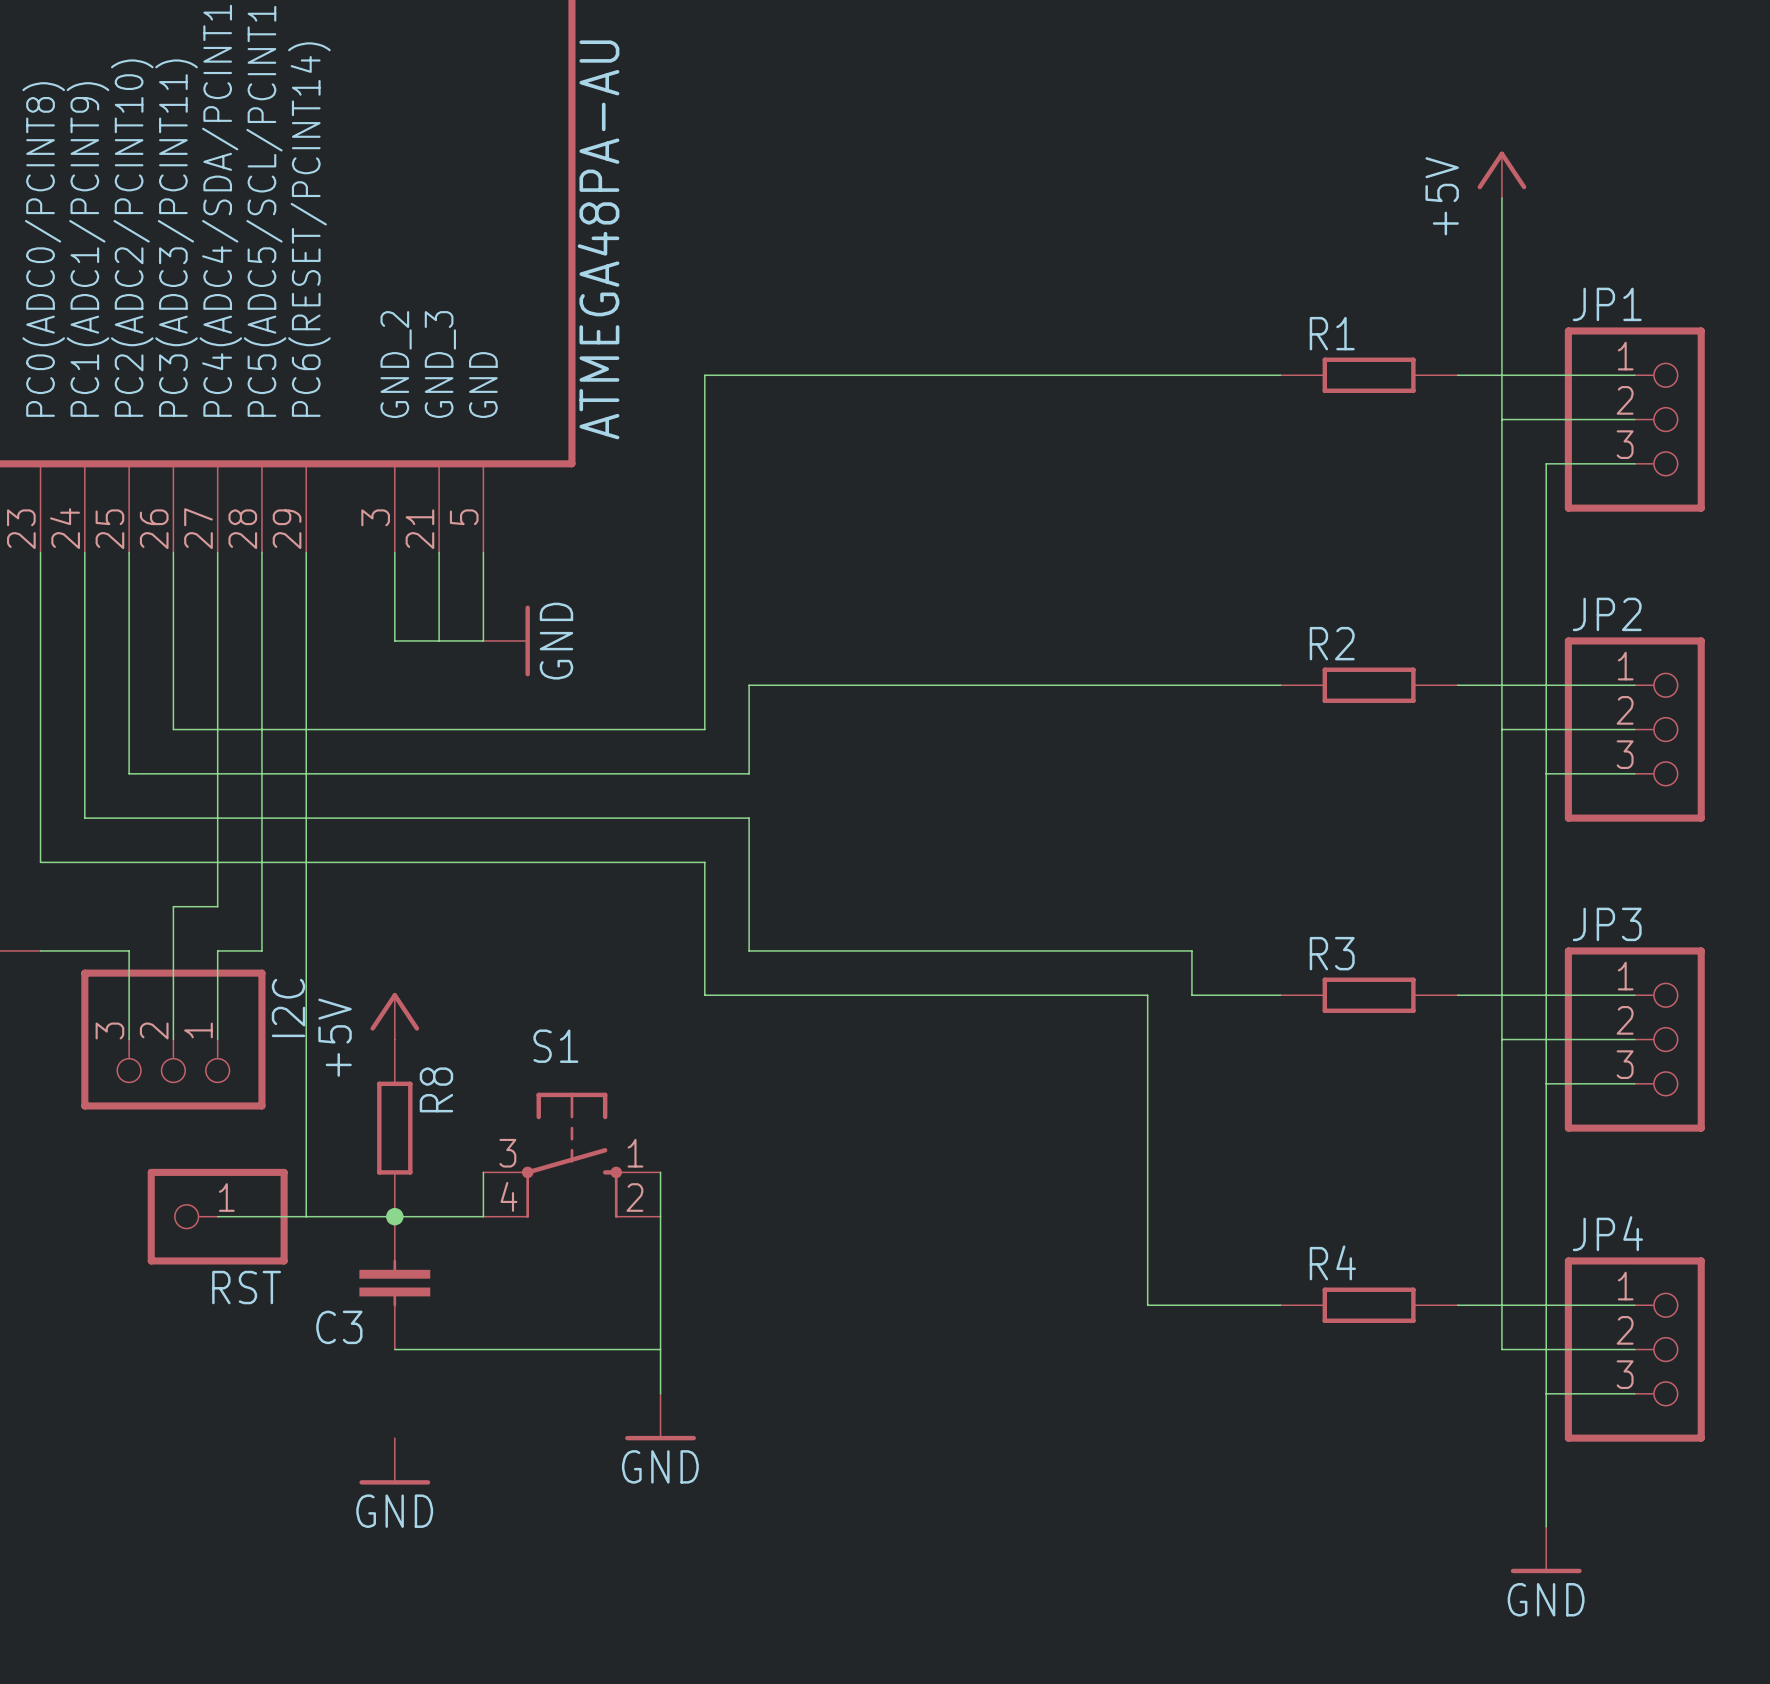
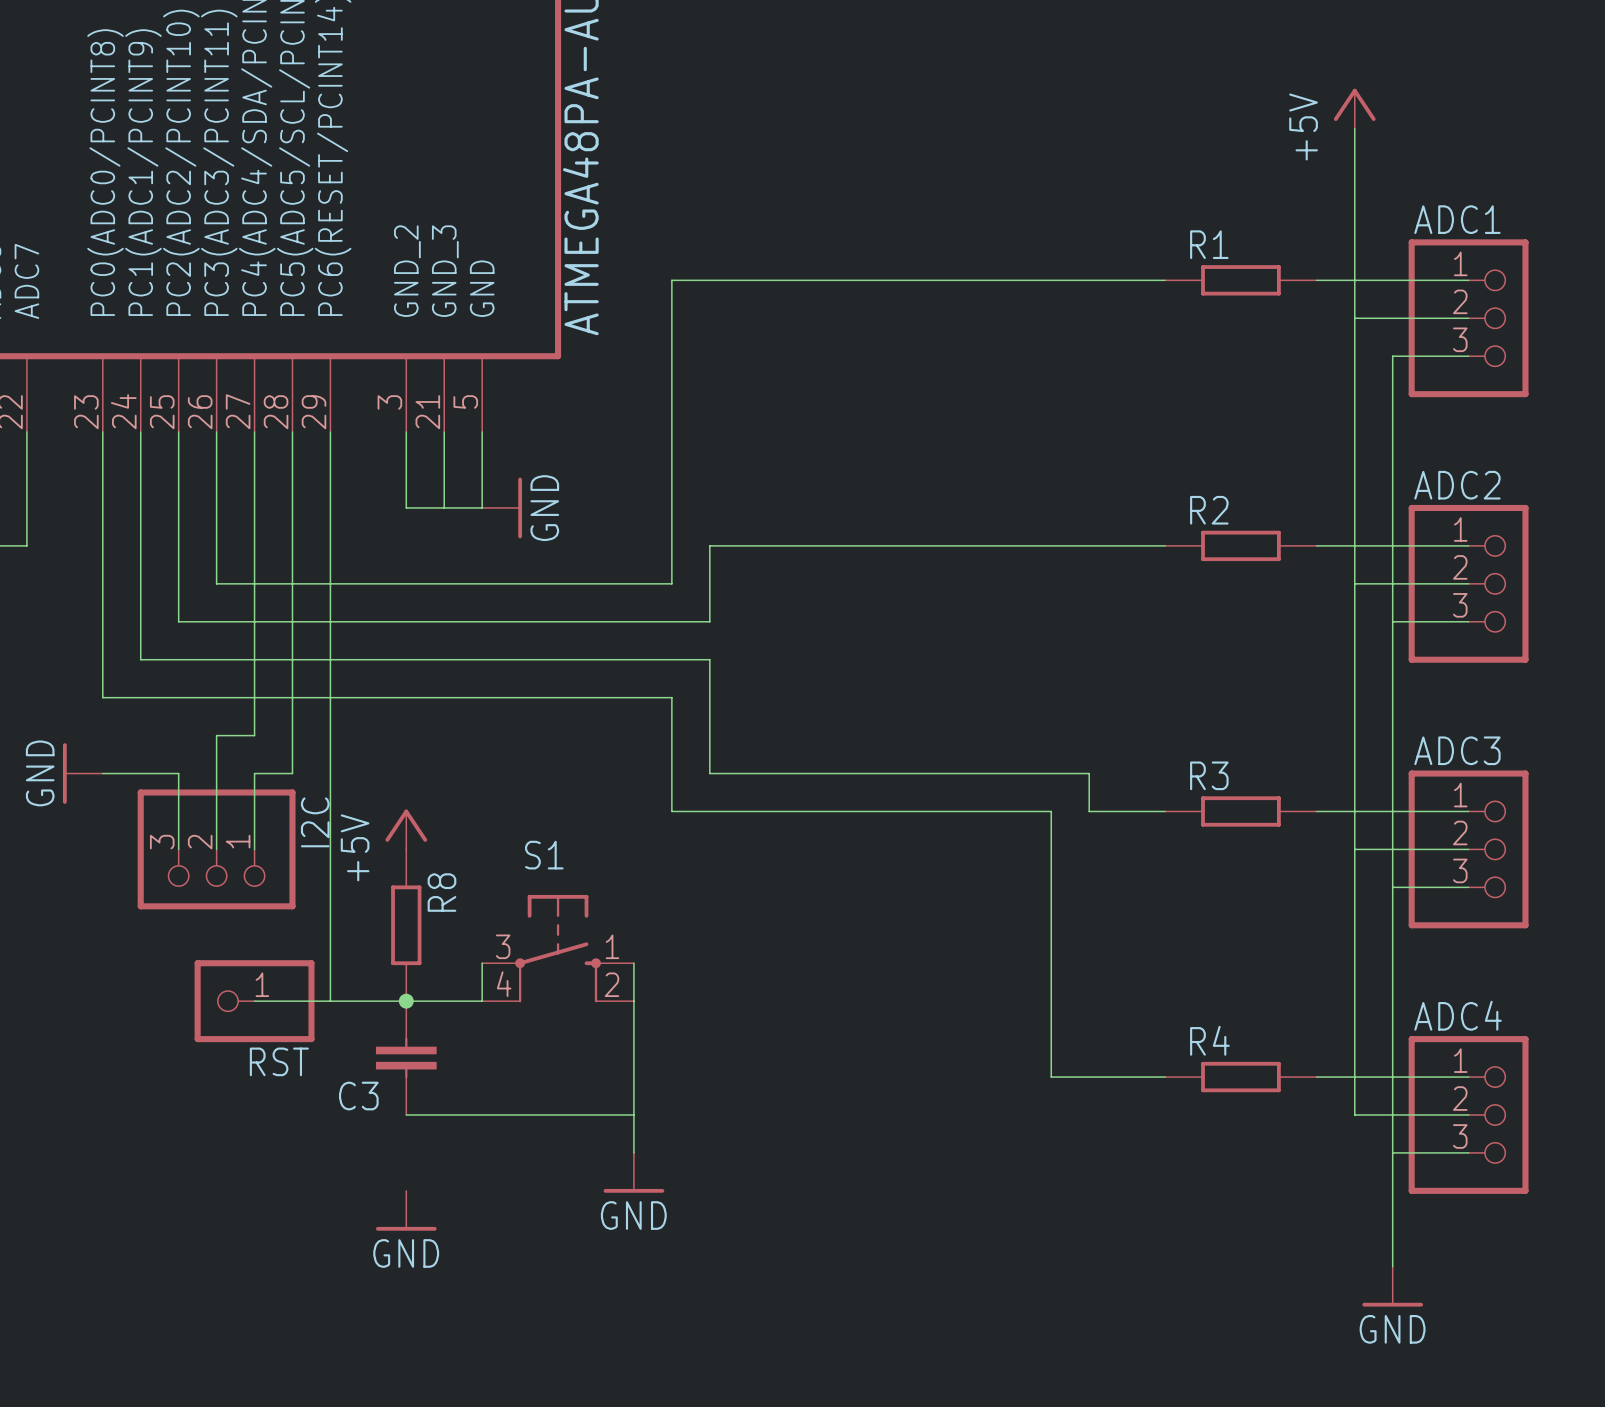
JP1 name: JP1 (1607, 304) -> ADC1 (1457, 219)
JP2 name: JP2 (1607, 614) -> ADC2 (1457, 485)
JP3 name: JP3 (1607, 924) -> ADC3 (1457, 750)
JP4 name: JP4 (1607, 1233) -> ADC4 (1458, 1015)

